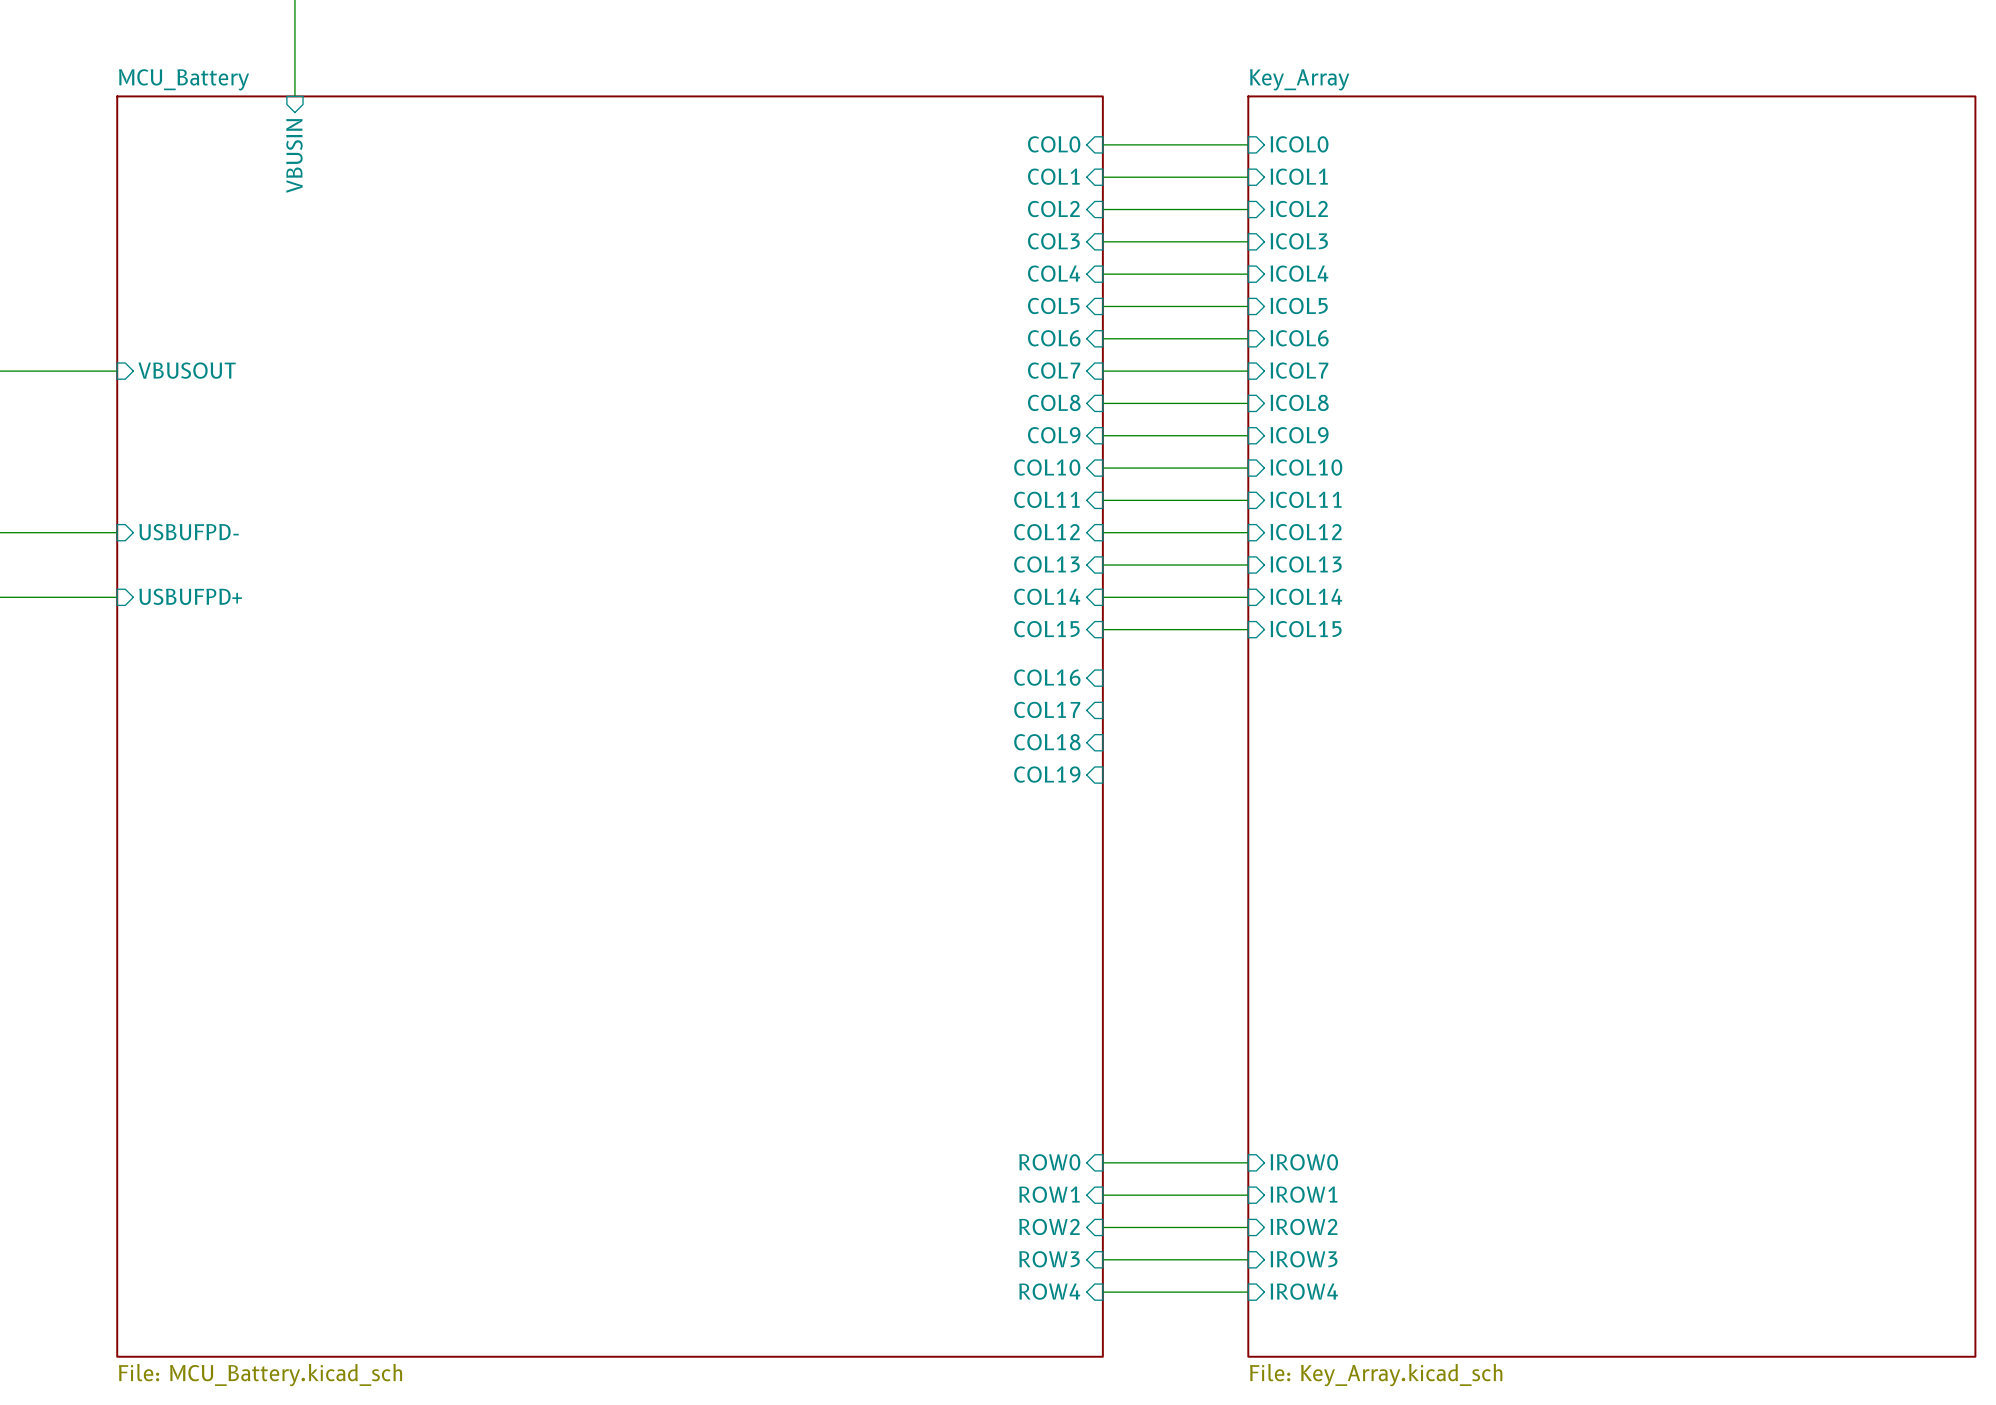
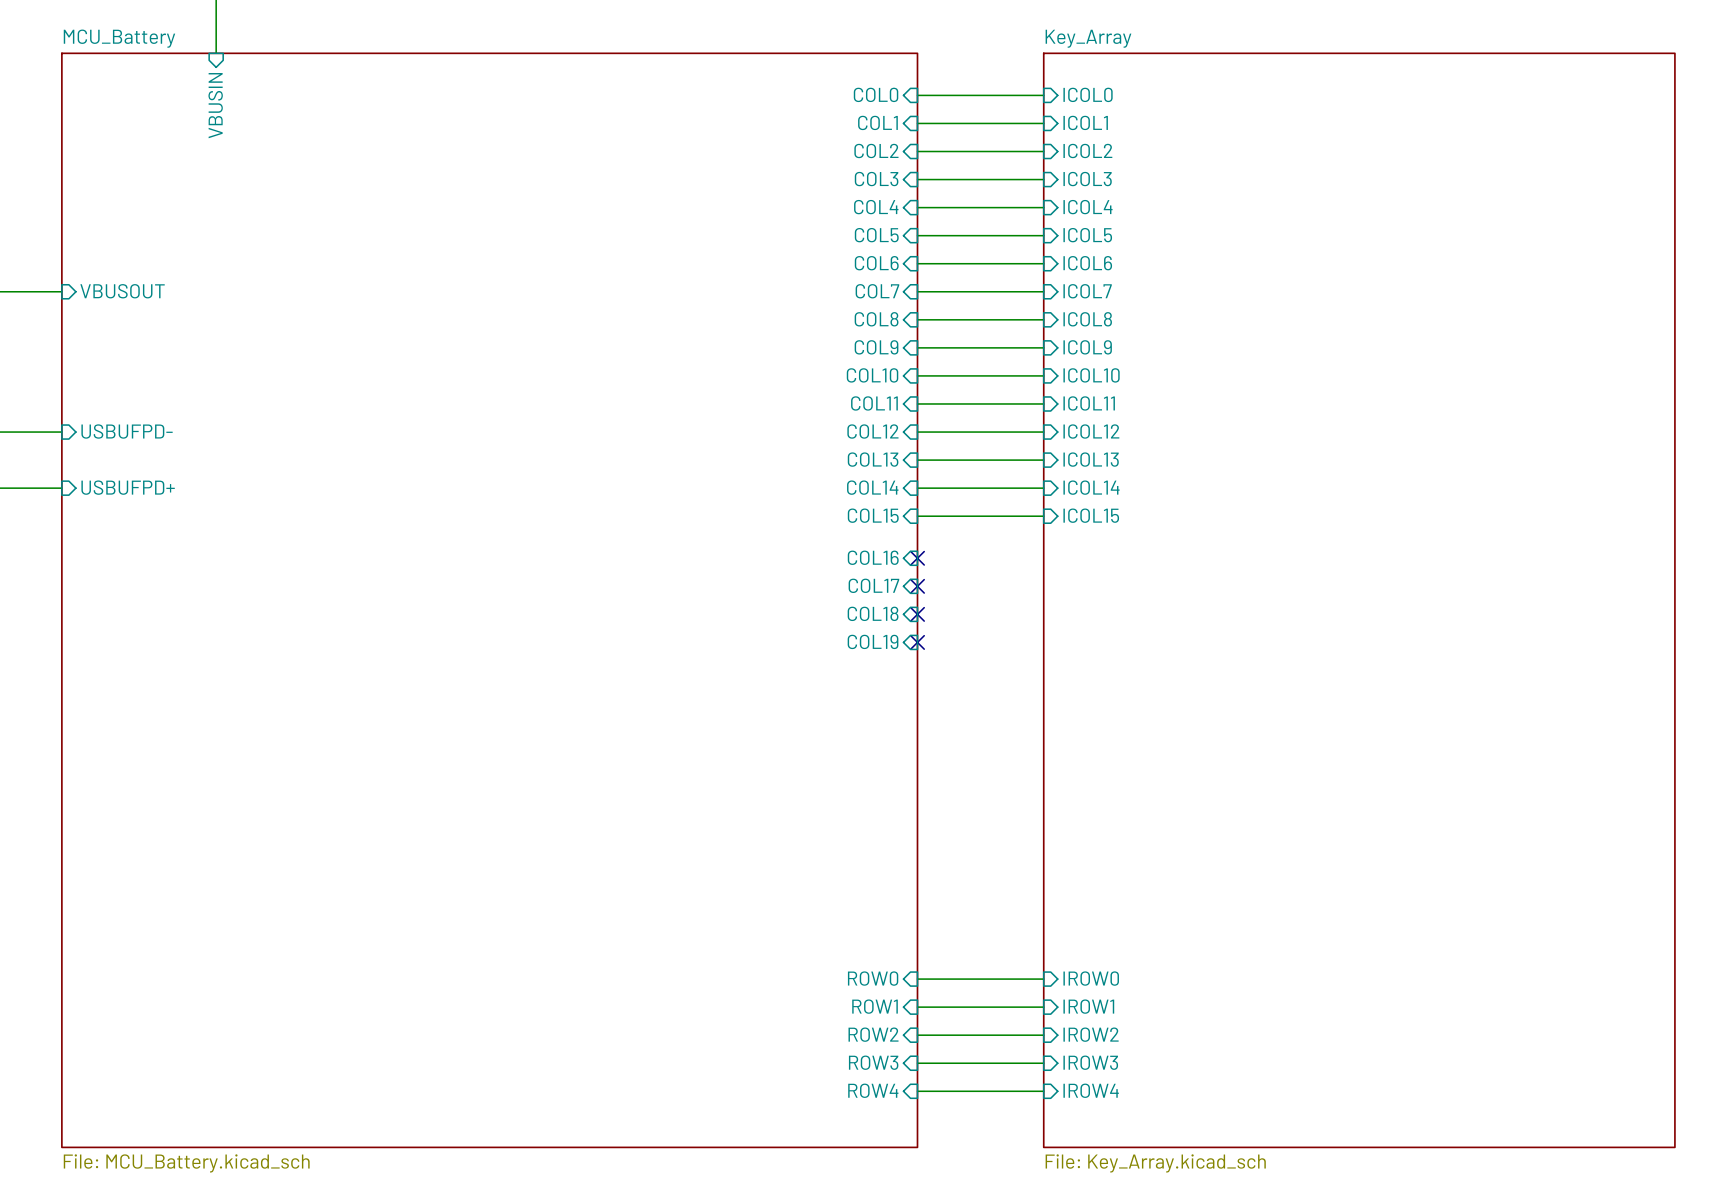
no-connect mark: none -> (917, 558)
no-connect mark: none -> (917, 586)
no-connect mark: none -> (917, 614)
no-connect mark: none -> (917, 642)

